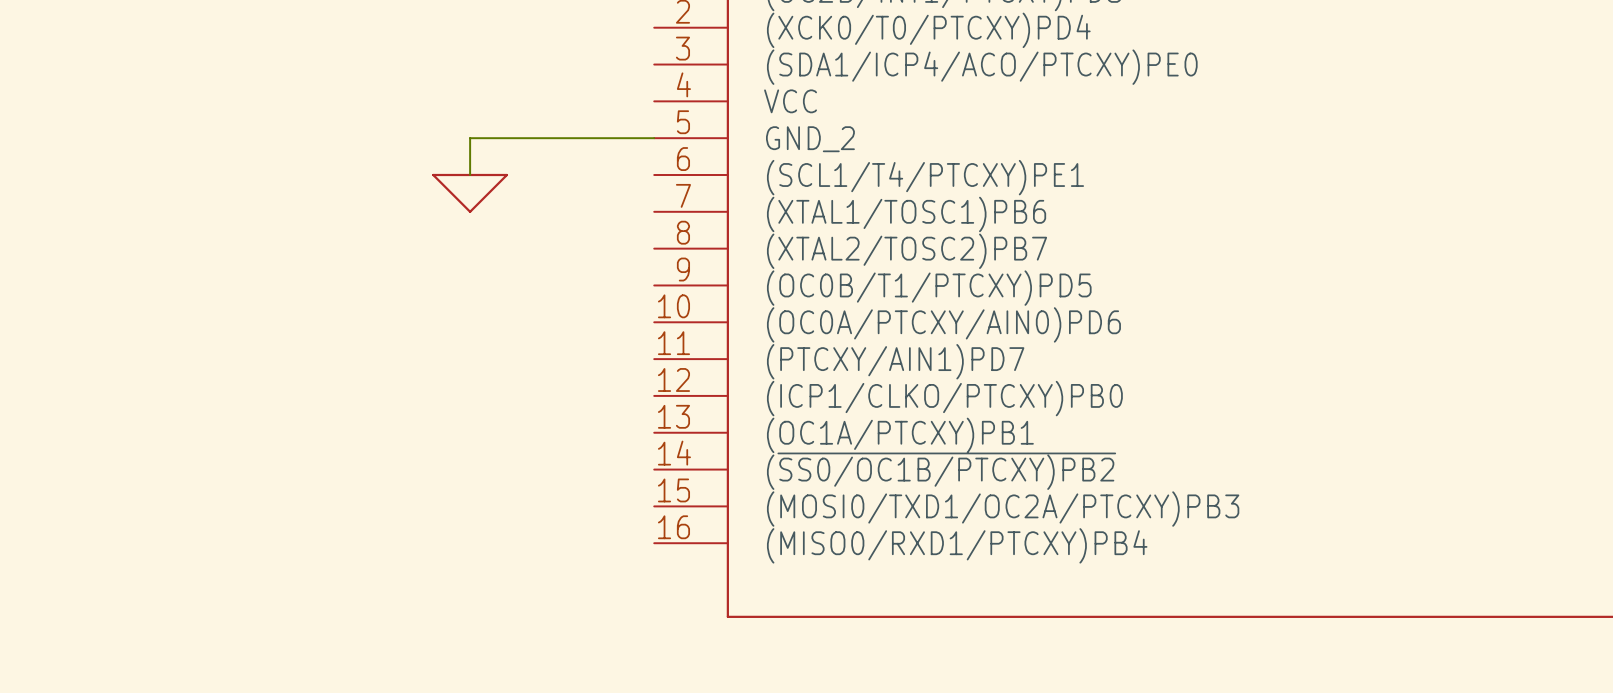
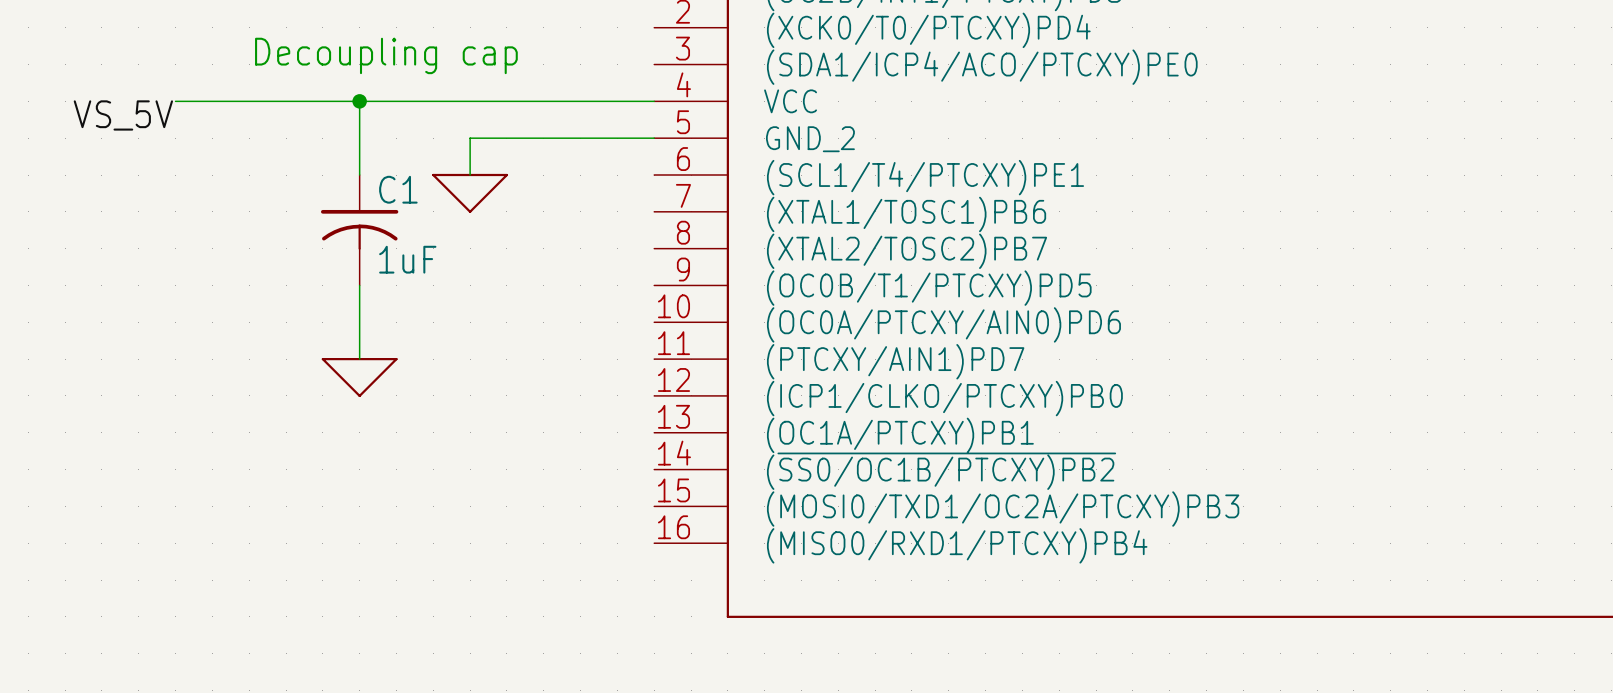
text: none -> Decoupling cap (386, 55)
wire: none -> (175, 101) (654, 101)
wire: none -> (359, 101) (359, 175)
junction: none -> (359, 101)
label: none -> VS_5V (123, 115)
C1: none -> 1uF (359, 230)
wire: none -> (359, 285) (359, 359)
power symbol: none -> (359, 377)

